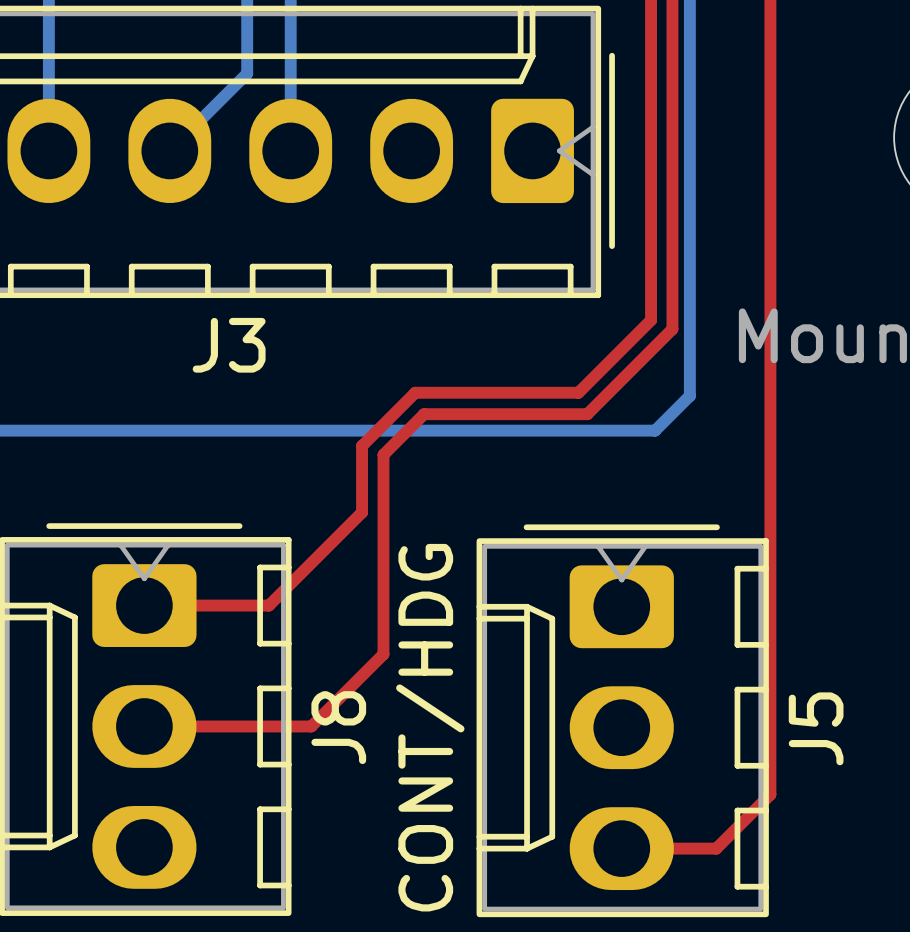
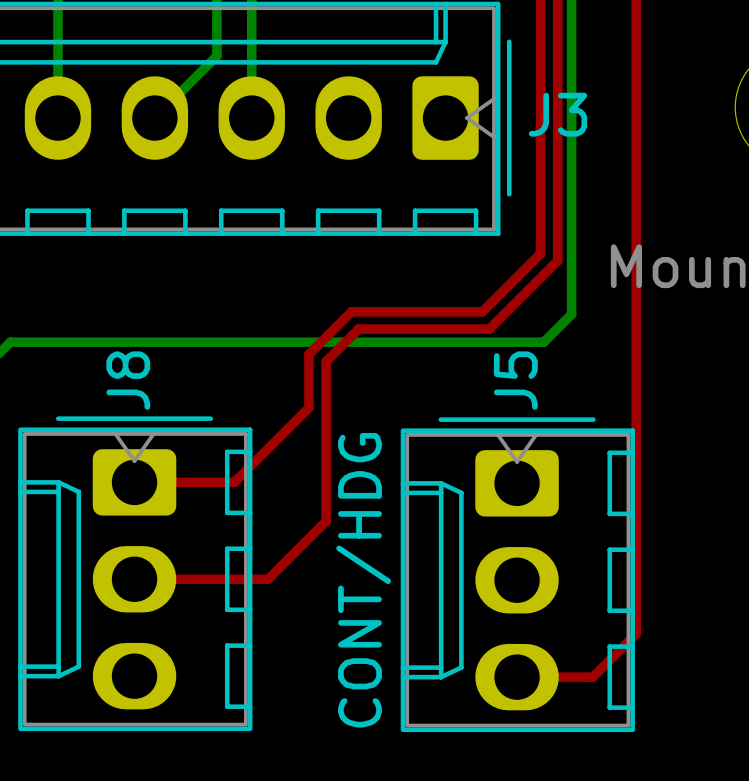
J3 name position: J3 (229, 345) -> J3 (558, 114)
J8 name position: J8 (338, 727) -> J8 (128, 380)
J5 name position: J5 (816, 728) -> J5 (515, 380)

